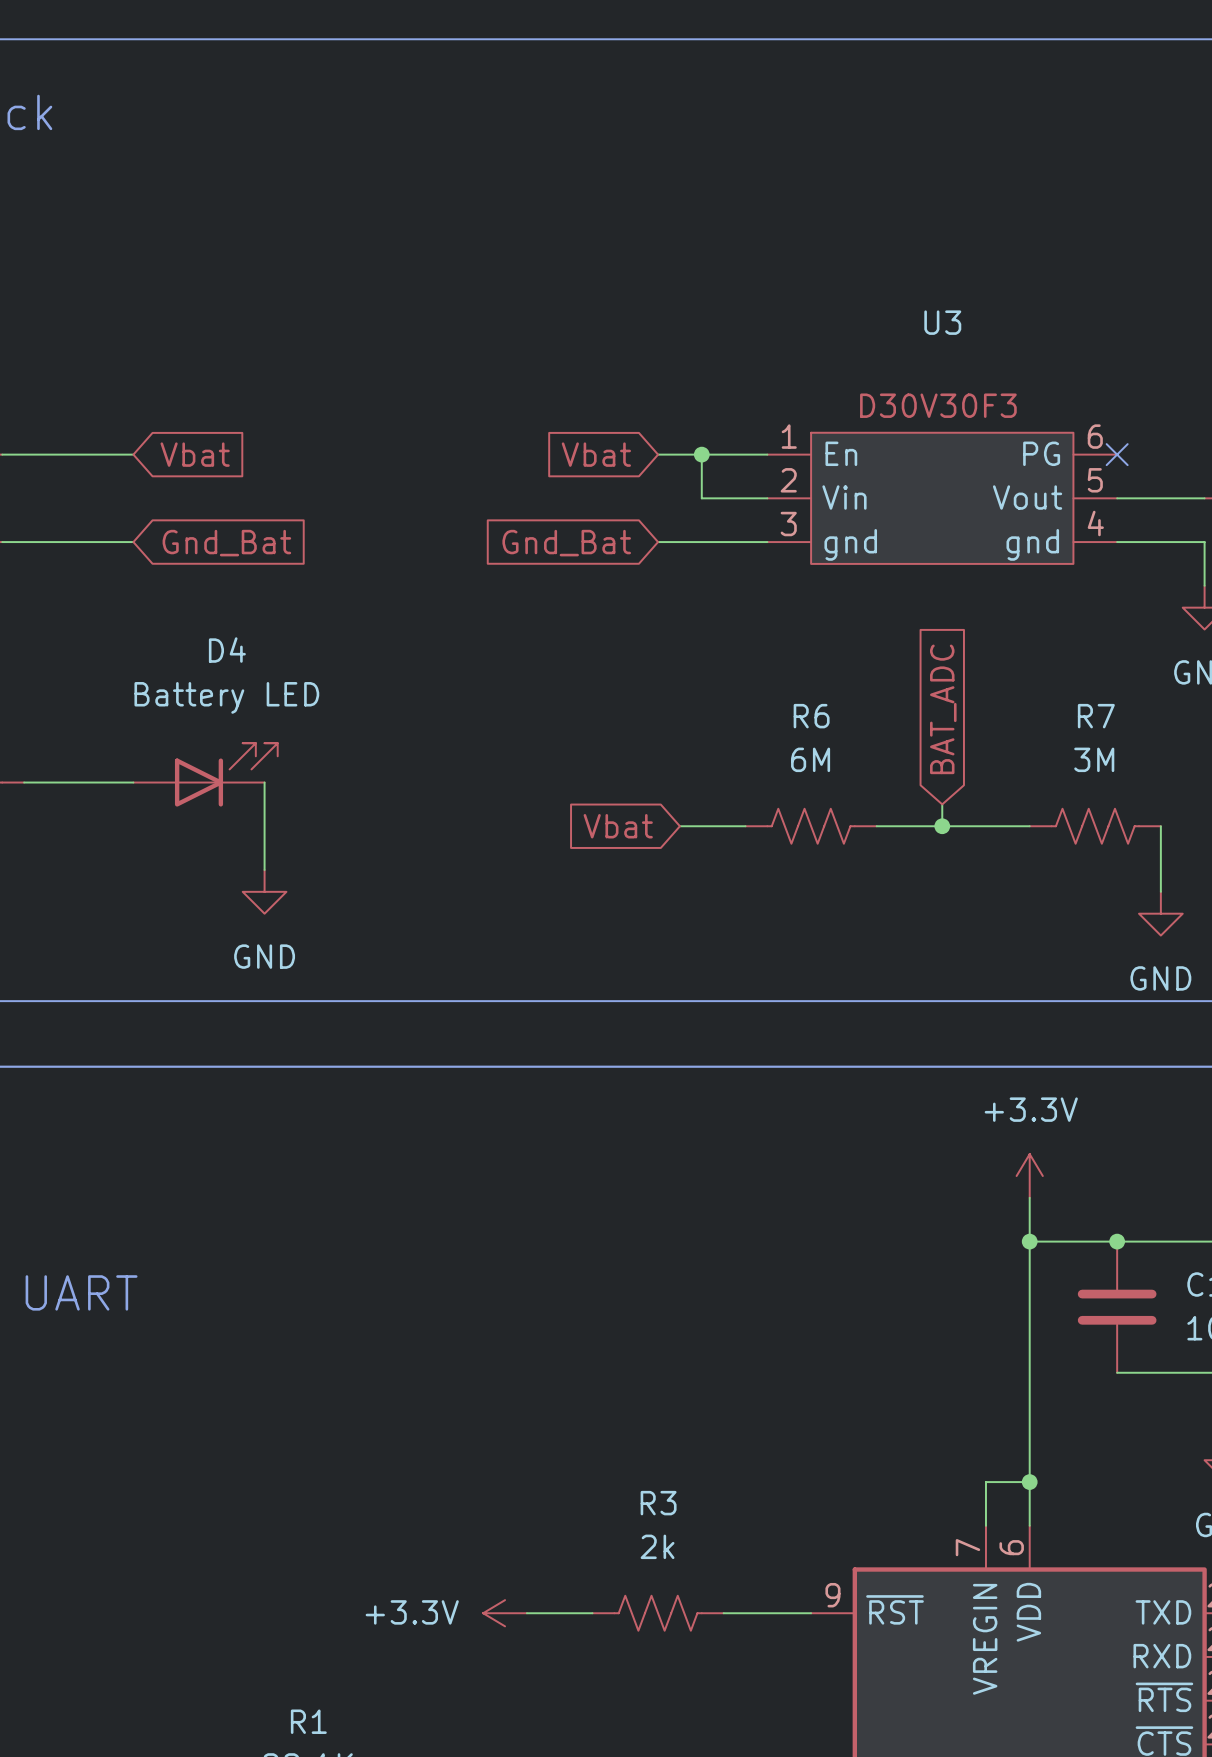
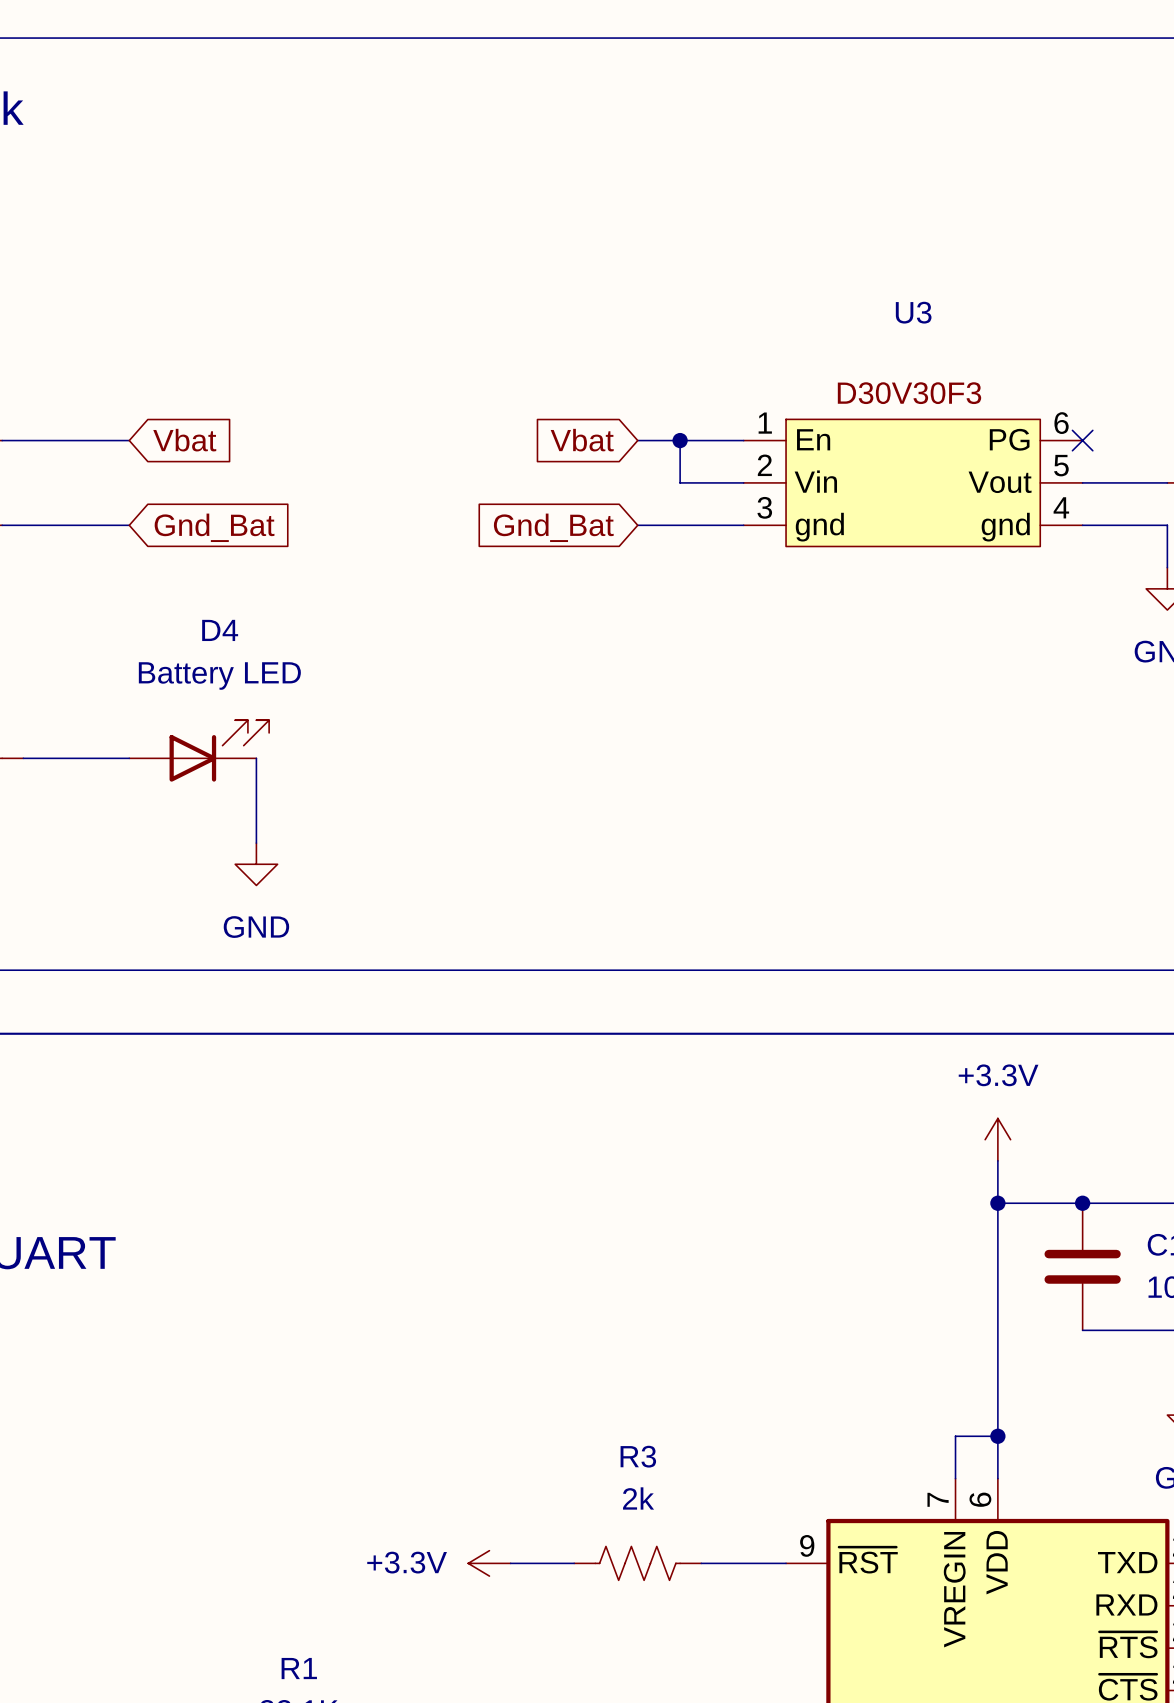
global label: BAT_ADC (943, 709) -> none
wire: (942, 804) (942, 826) -> none
global label: Vbat (618, 826) -> none
wire: (679, 826) (745, 826) -> none
R6: 6M (811, 826) -> none
wire: (876, 826) (1029, 826) -> none
junction: (942, 826) -> none
R7: 3M (1095, 826) -> none
wire: (1160, 826) (1160, 891) -> none
power symbol: GND (1160, 913) -> none

